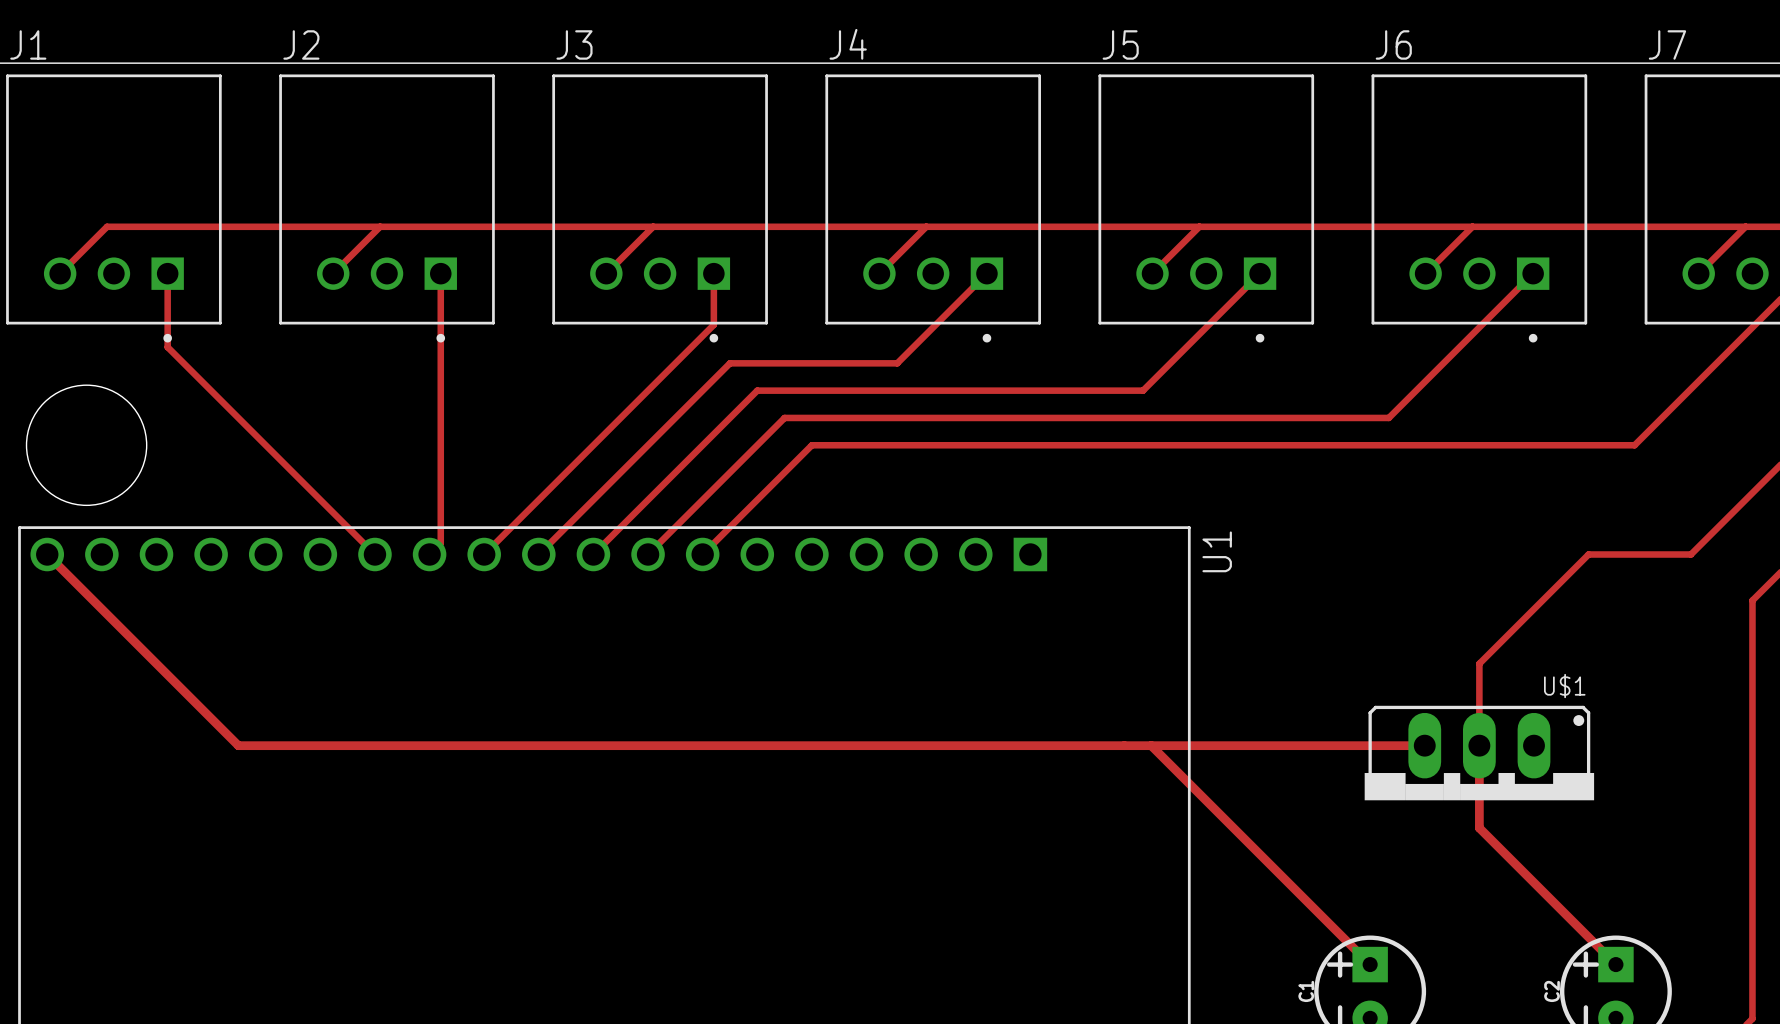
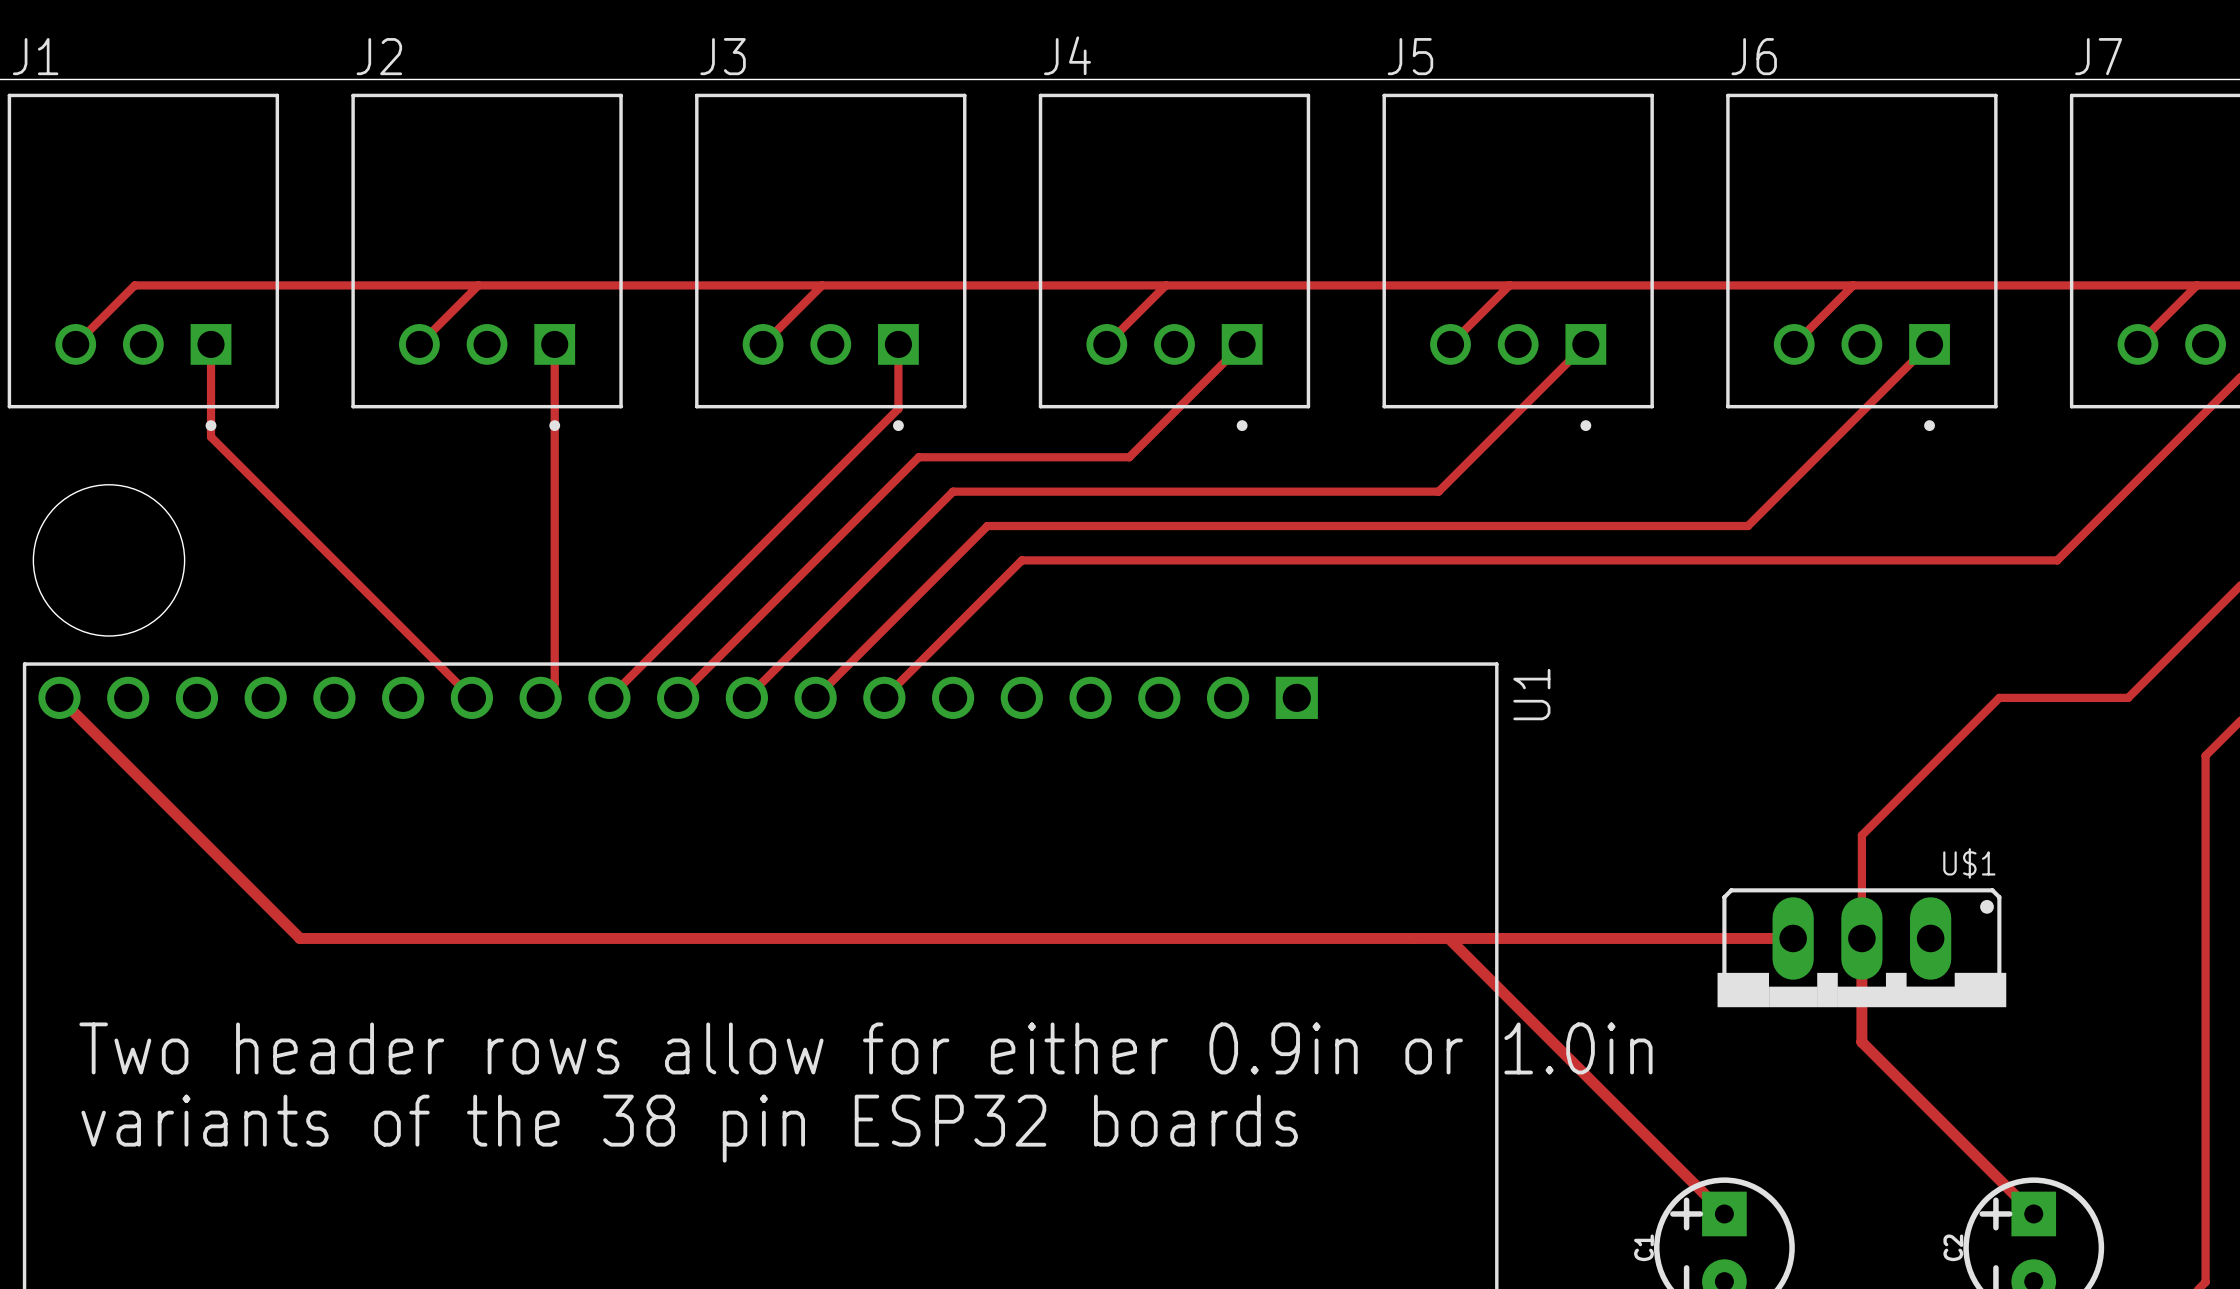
text: none -> Two header rows allow for either 0.9in or 1.0in (865, 1048)
text: none -> variants of the 38 pin ESP32 boards (689, 1128)

